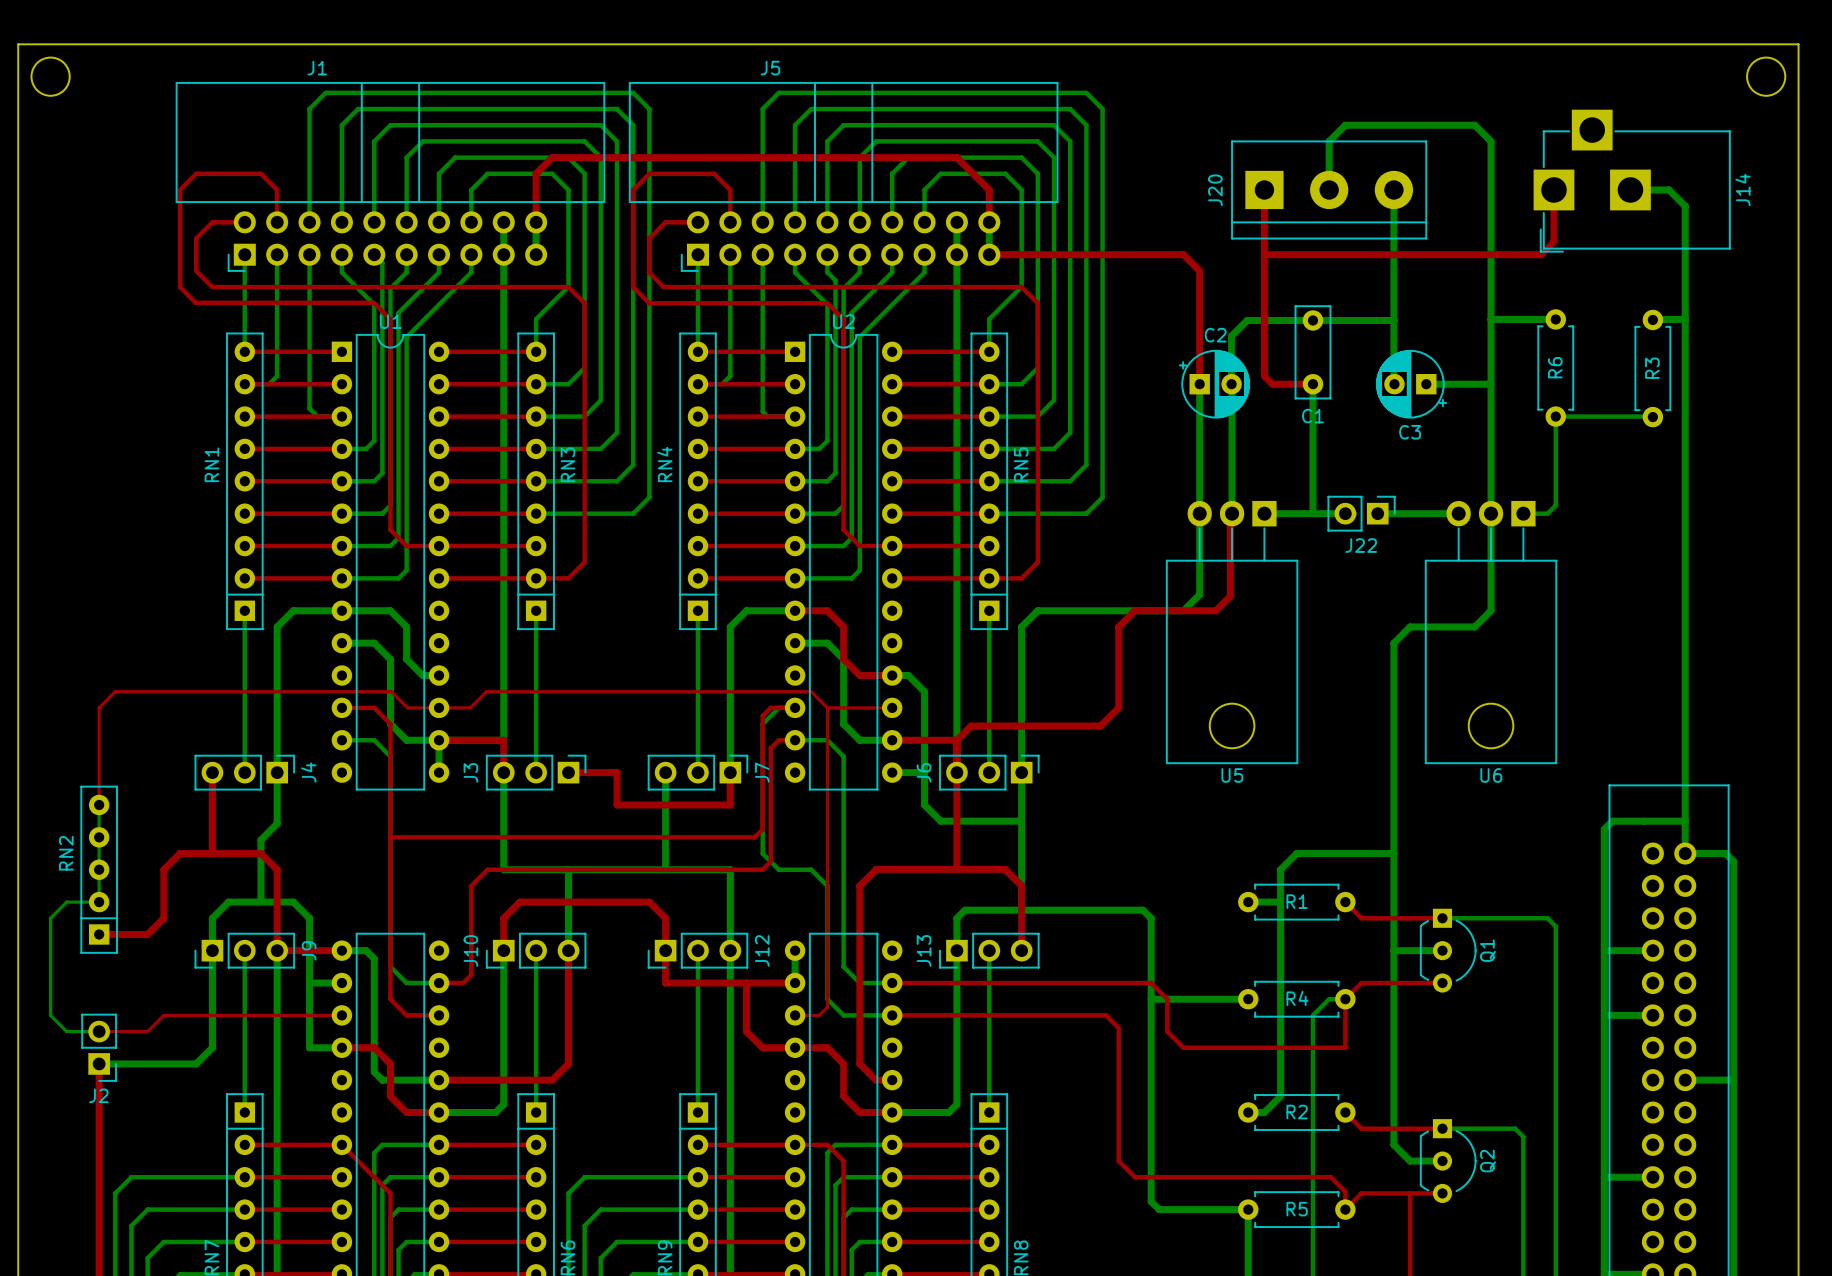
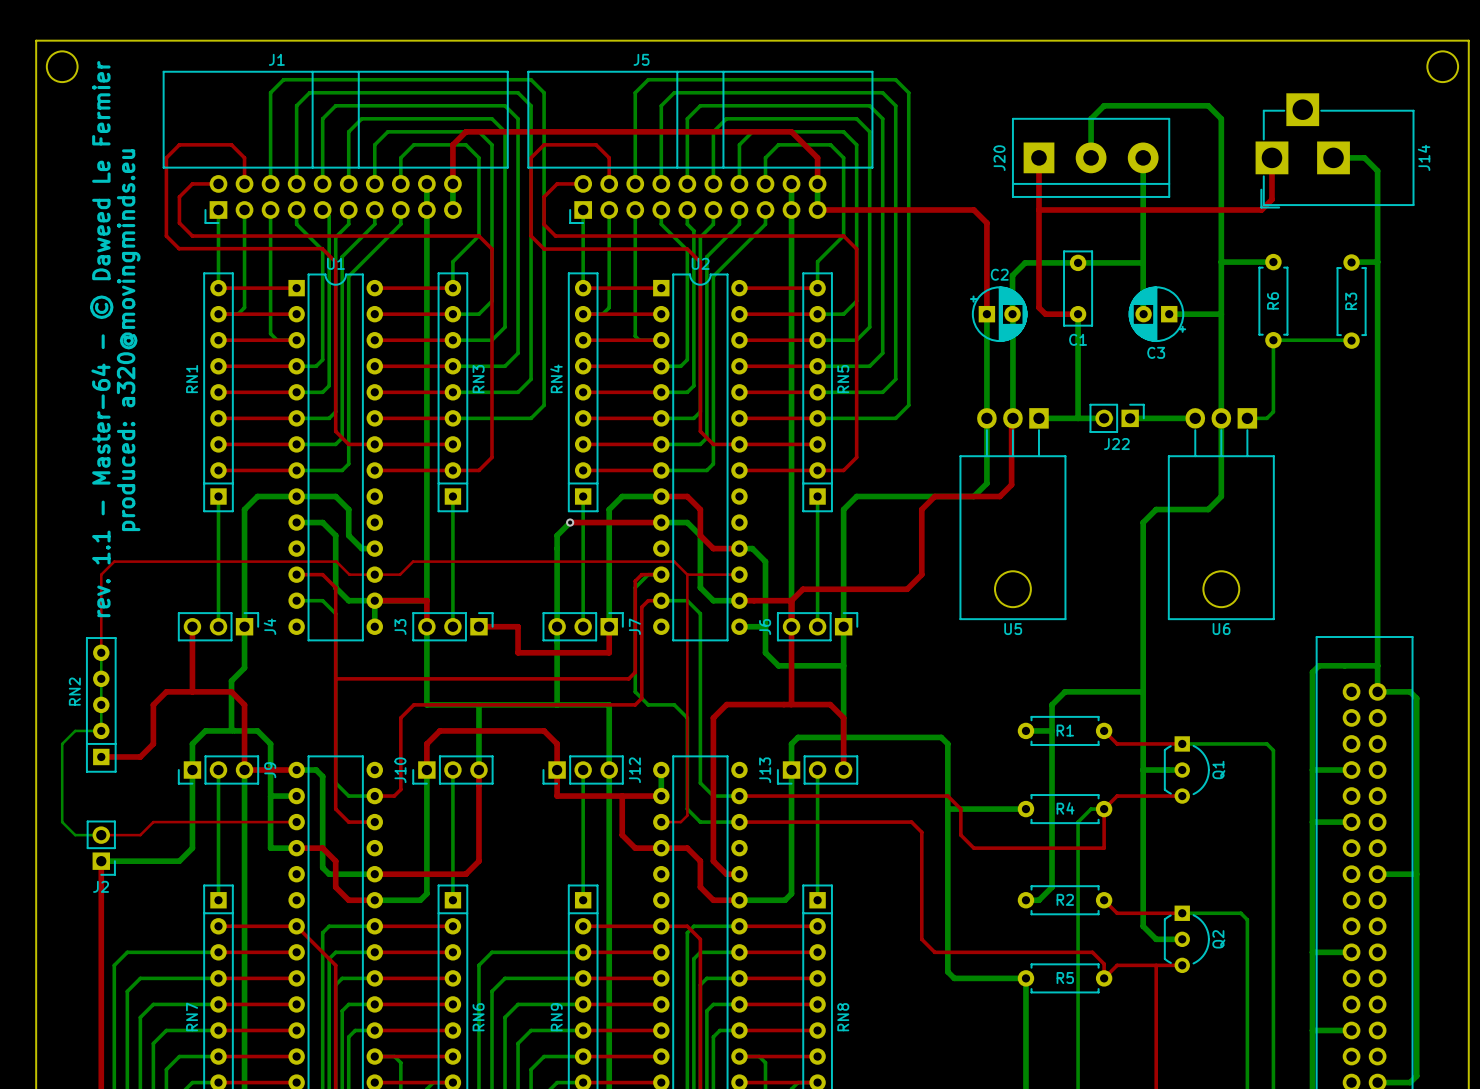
text: none -> rev. 1.1 - Master-64 - © Daweed Le Fermier (101, 339)
text: none -> produced: a320@movingminds.eu (128, 340)
bottom track: none -> (570, 522) (557, 535) (557, 626)
top track: none -> (570, 522) (661, 522)
via: none -> (570, 522)

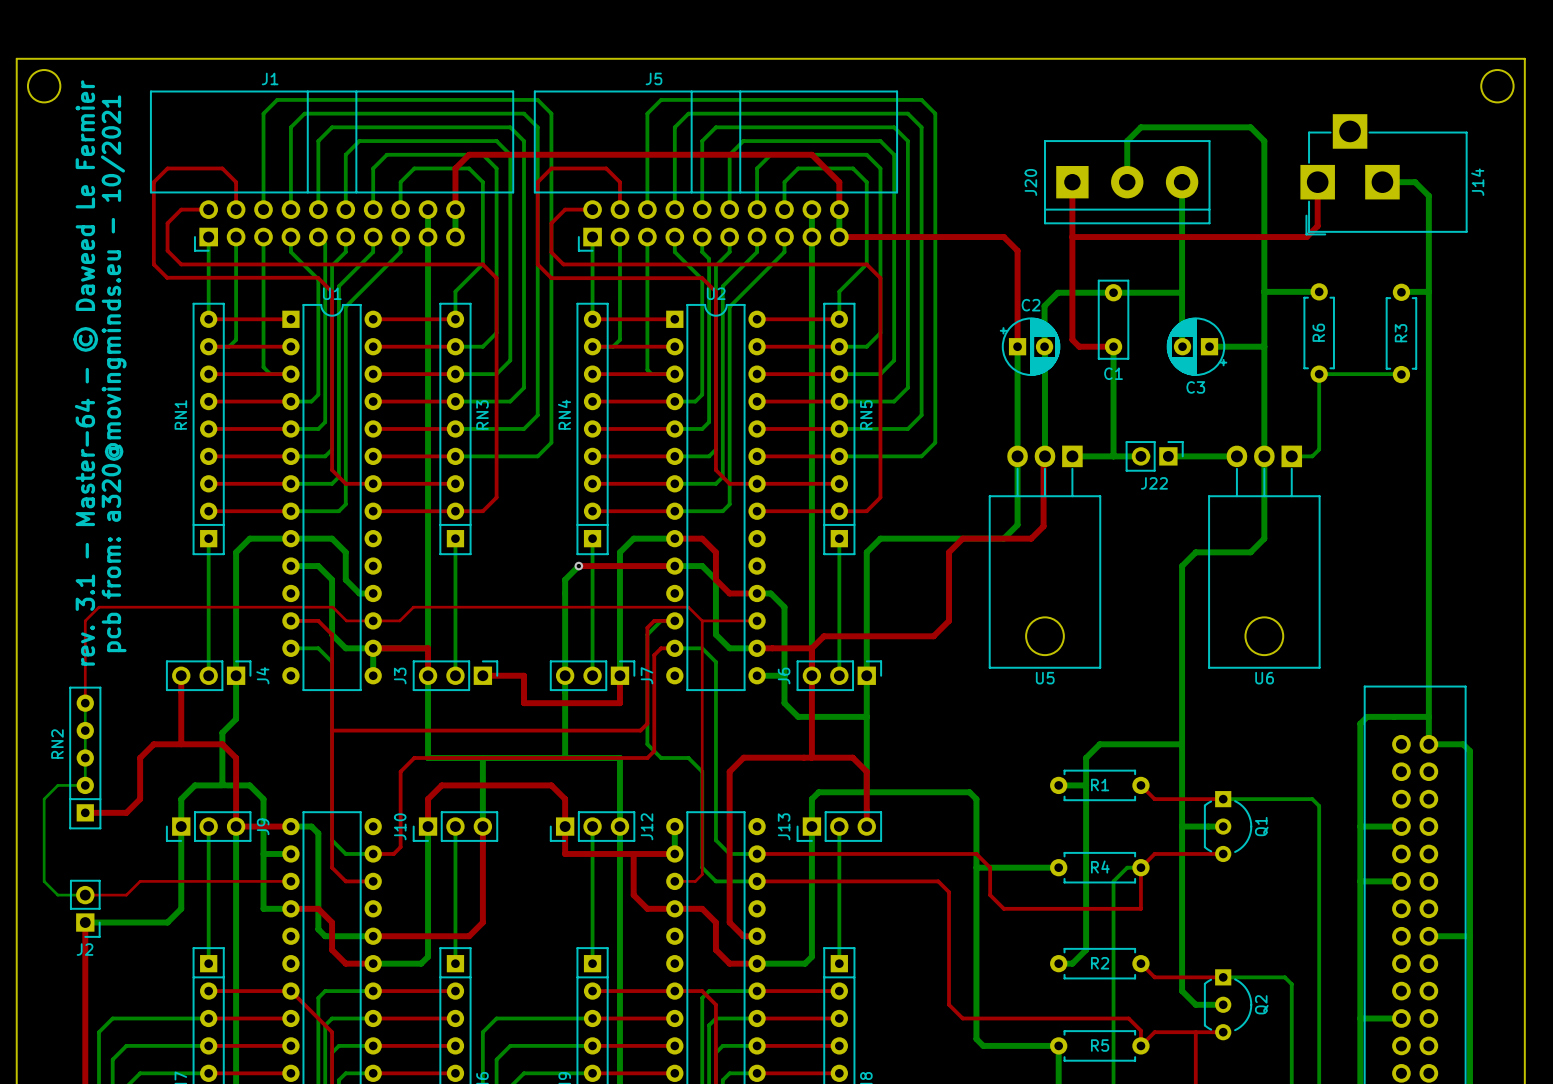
text: rev. 1.1 - Master-64 - © Daweed Le Fermier (101, 339) -> rev. 3.1 - Master-64 - © Daweed Le Fermier (85, 372)
text: produced: a320@movingminds.eu (128, 340) -> pcb from: a320@movingminds.eu - 10/2021 (113, 373)

